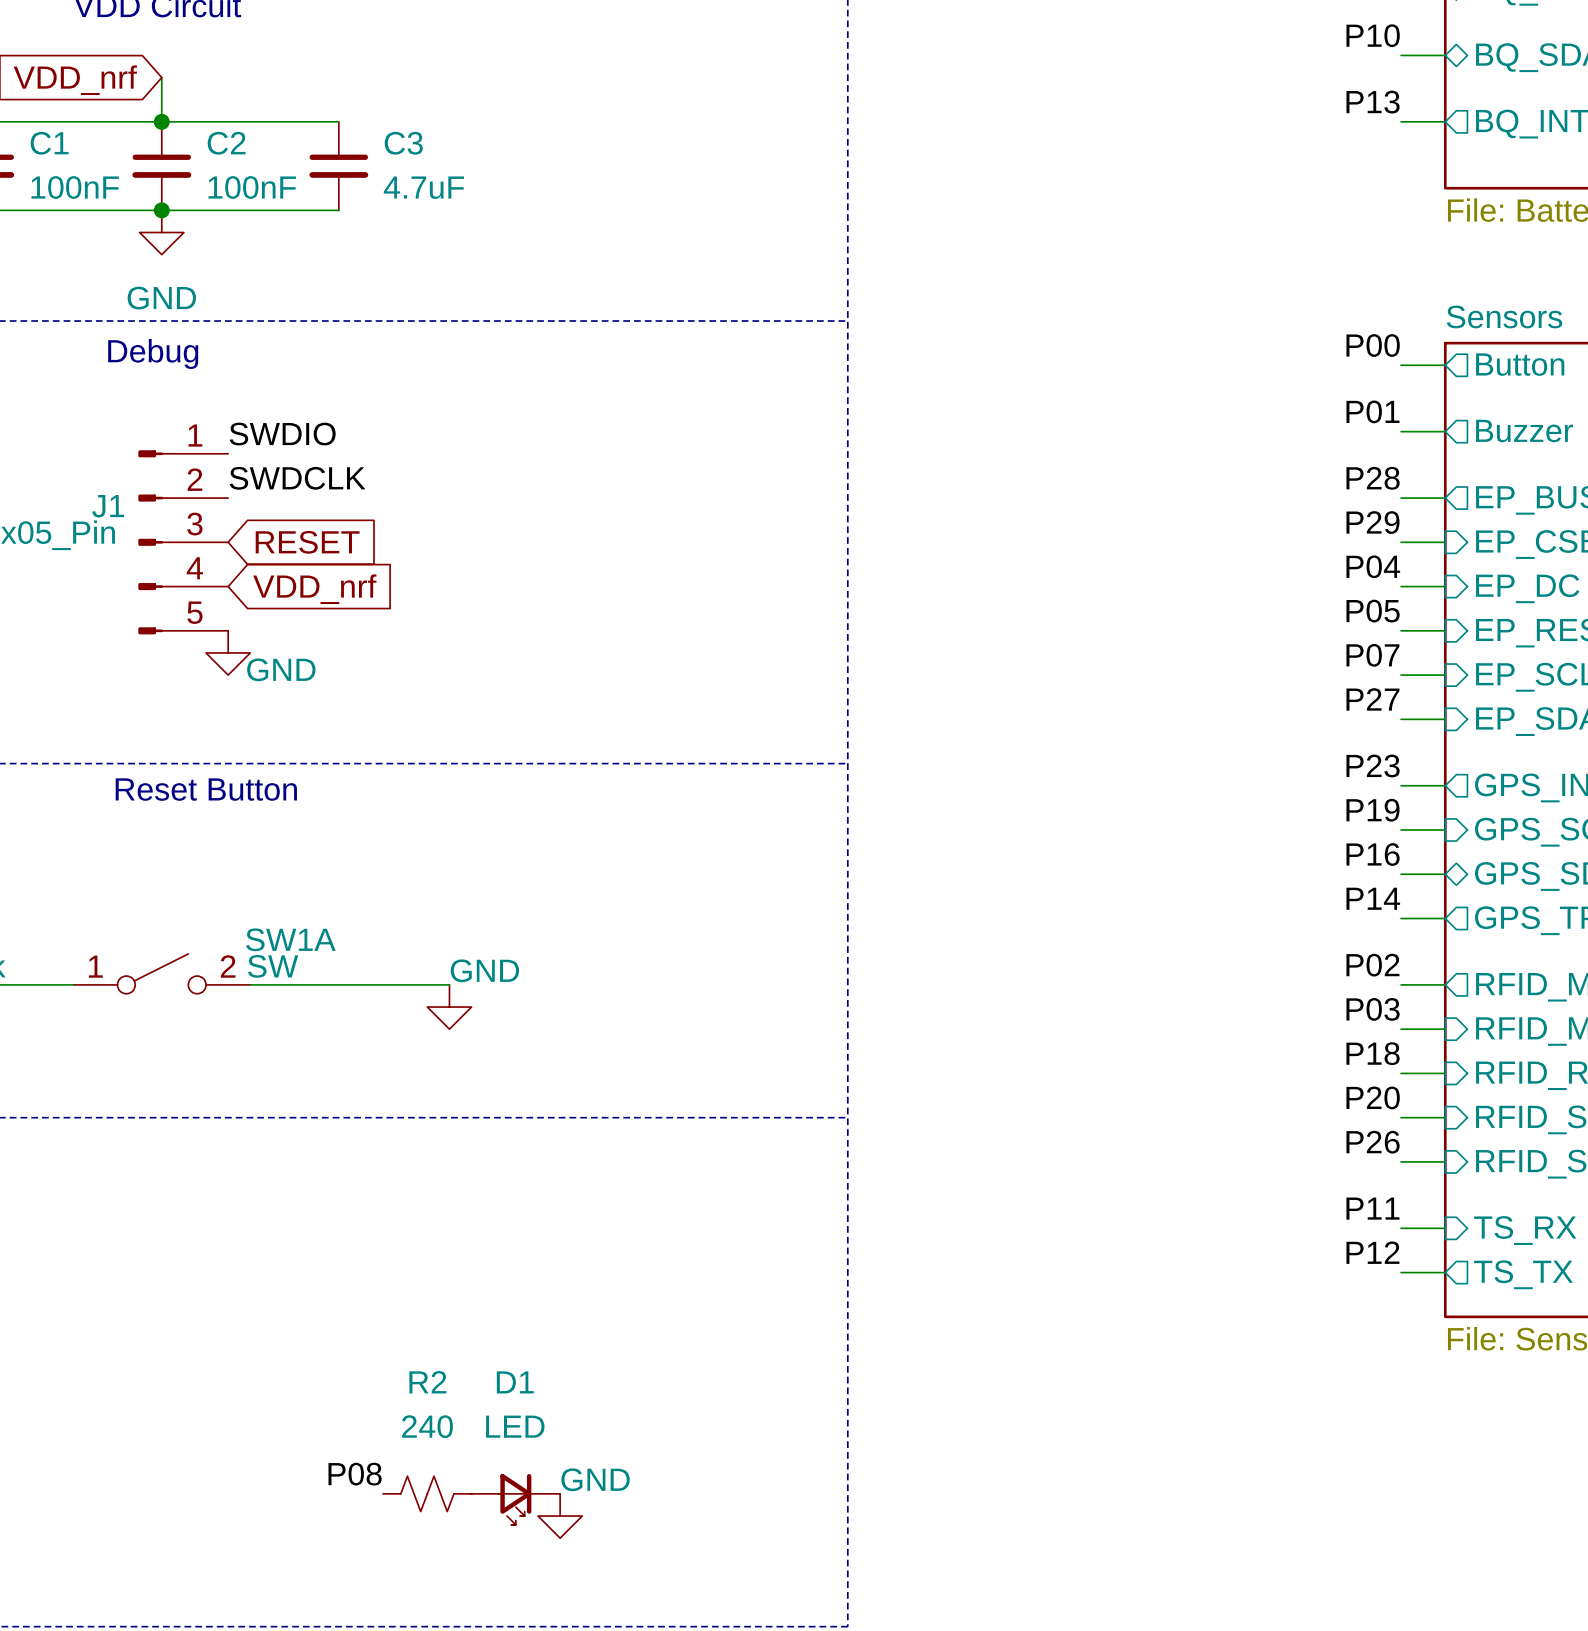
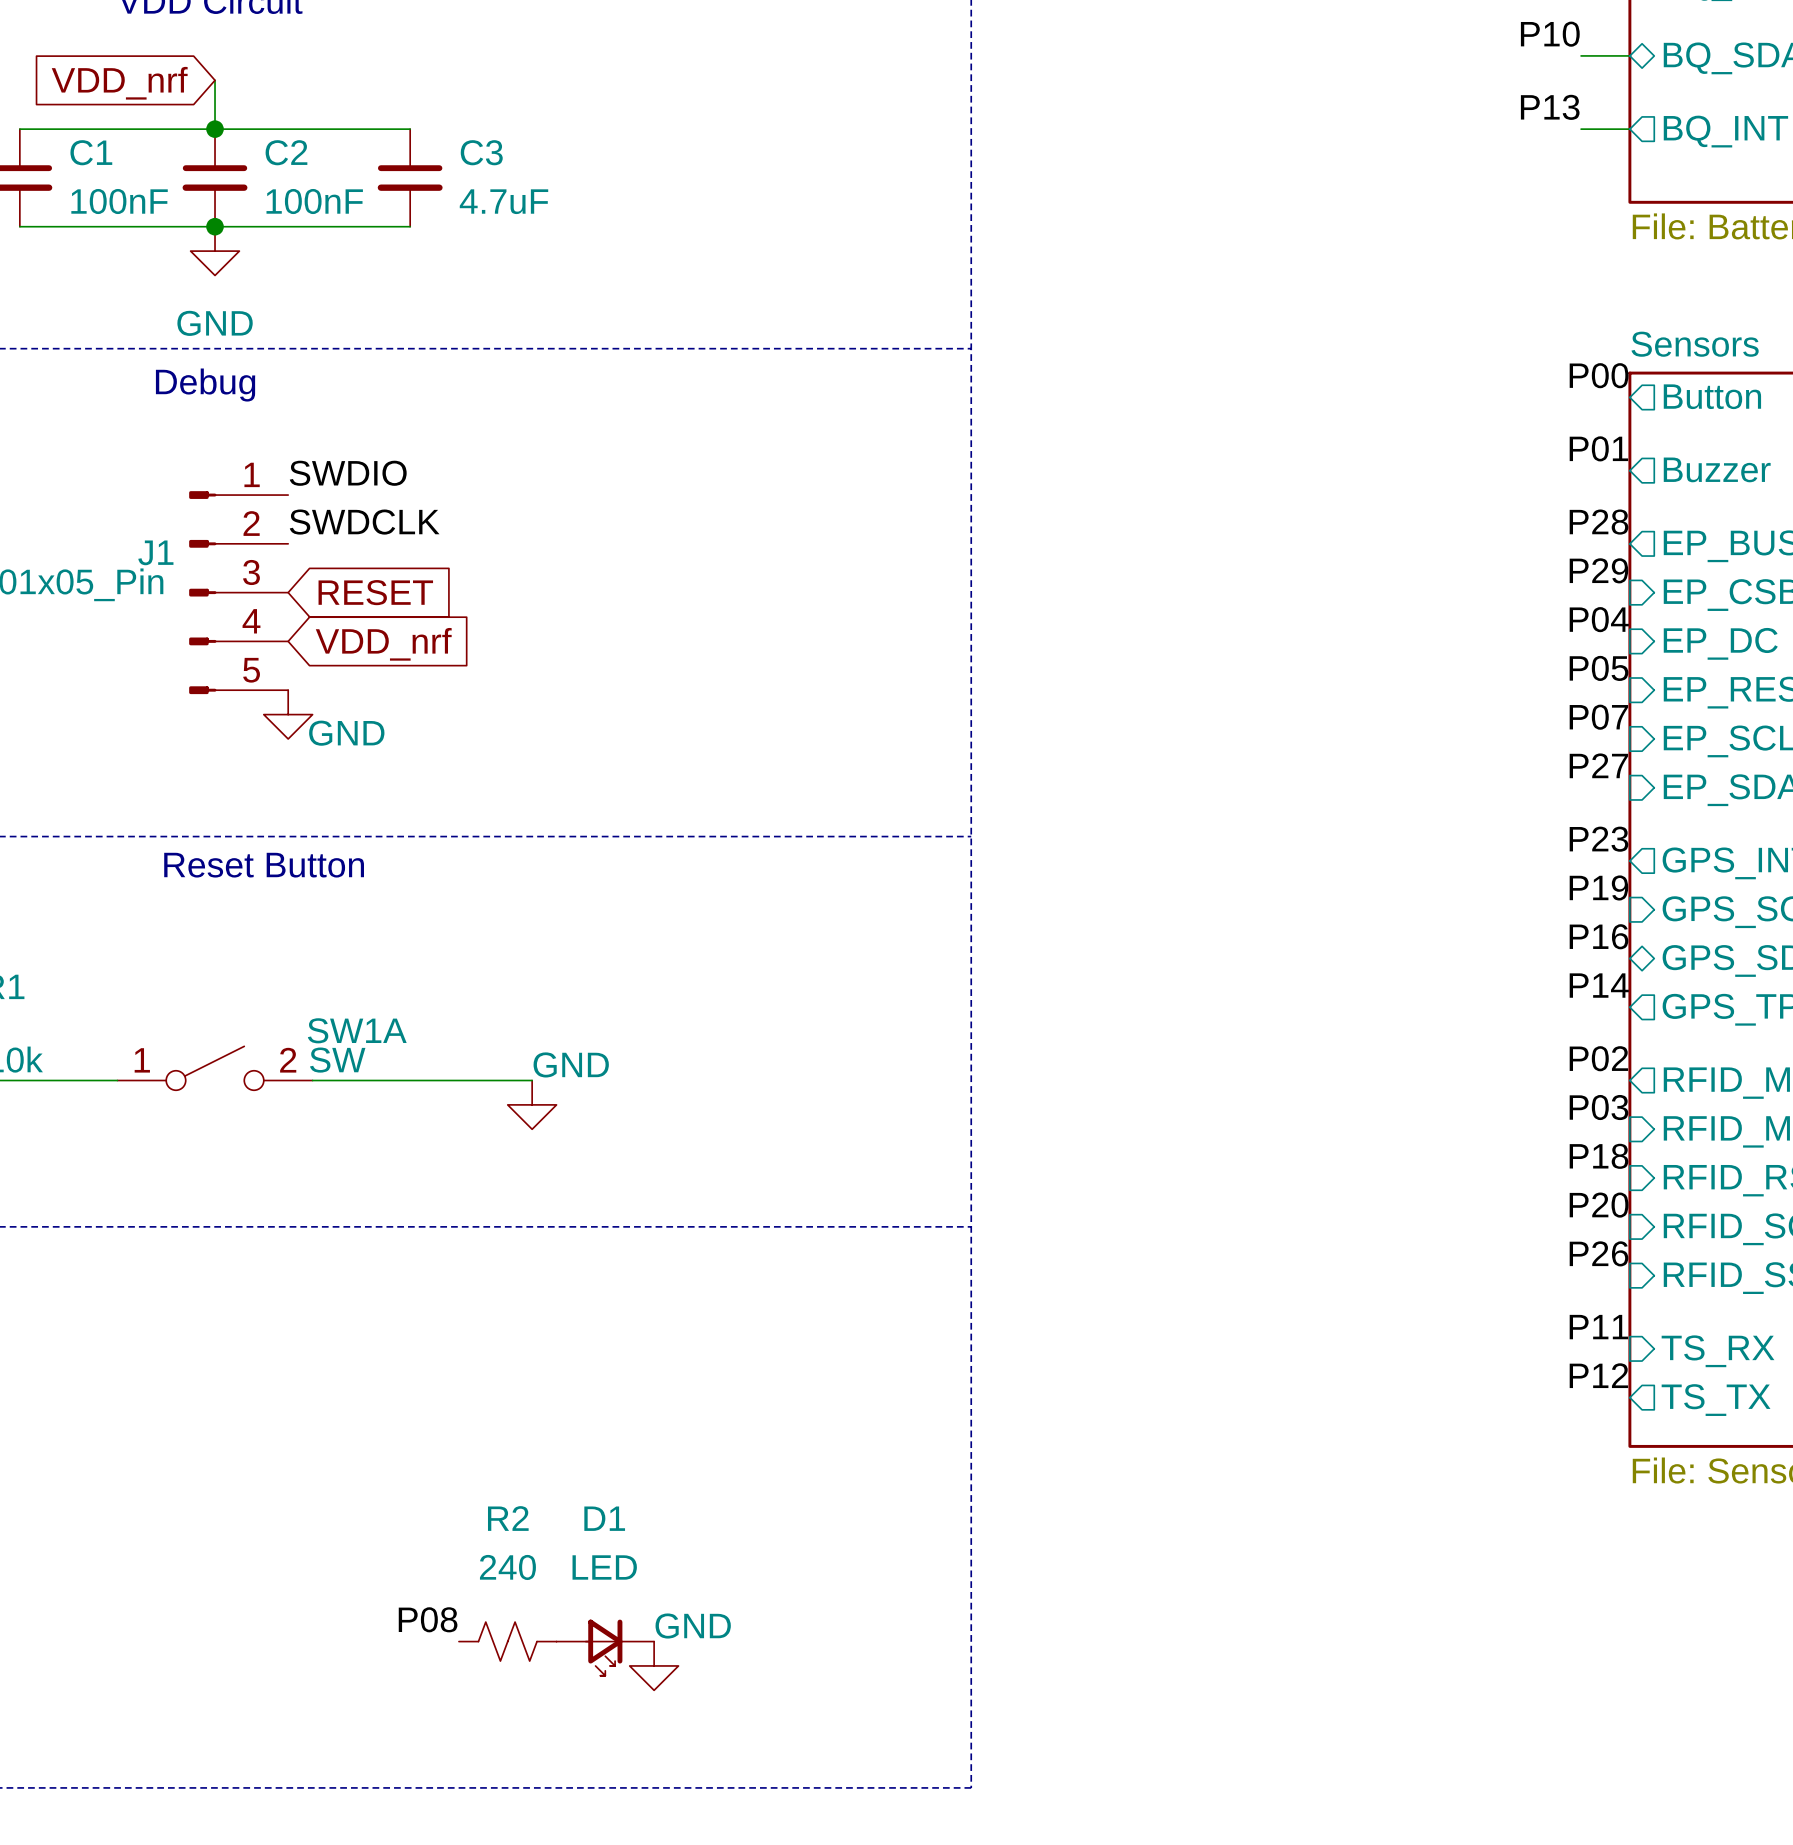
label position: P00 (1373, 345) -> P00 (1599, 375)
wire: (1401, 365) (1445, 365) -> none
label position: P01 (1372, 411) -> P01 (1598, 448)
wire: (1401, 431) (1445, 431) -> none
label position: P28 (1373, 478) -> P28 (1599, 522)
wire: (1401, 498) (1445, 498) -> none
label position: P29 (1372, 522) -> P29 (1598, 570)
wire: (1401, 542) (1445, 542) -> none
label position: P04 (1373, 566) -> P04 (1599, 619)
wire: (1401, 586) (1445, 586) -> none
label position: P05 (1373, 611) -> P05 (1599, 668)
wire: (1401, 630) (1445, 630) -> none
label position: P07 (1372, 655) -> P07 (1598, 717)
wire: (1401, 675) (1445, 675) -> none
label position: P27 (1372, 699) -> P27 (1598, 765)
wire: (1401, 719) (1445, 719) -> none
label position: P23 (1373, 765) -> P23 (1599, 839)
wire: (1401, 785) (1445, 785) -> none
label position: P19 (1372, 810) -> P19 (1598, 887)
wire: (1401, 830) (1445, 830) -> none
label position: P16 (1373, 854) -> P16 (1599, 936)
wire: (1401, 874) (1445, 874) -> none
label position: P14 (1373, 898) -> P14 (1599, 985)
wire: (1401, 918) (1445, 918) -> none
label position: P02 (1372, 965) -> P02 (1598, 1058)
wire: (1401, 984) (1445, 984) -> none
label position: P03 (1373, 1009) -> P03 (1599, 1107)
wire: (1401, 1029) (1445, 1029) -> none
label position: P18 (1373, 1053) -> P18 (1599, 1156)
wire: (1401, 1073) (1445, 1073) -> none
label position: P20 (1373, 1097) -> P20 (1599, 1205)
wire: (1401, 1117) (1445, 1117) -> none
label position: P26 (1373, 1142) -> P26 (1599, 1253)
wire: (1401, 1161) (1445, 1161) -> none
label position: P11 (1372, 1208) -> P11 (1598, 1327)
wire: (1401, 1228) (1445, 1228) -> none
label position: P12 (1372, 1252) -> P12 (1598, 1375)
wire: (1401, 1272) (1445, 1272) -> none

